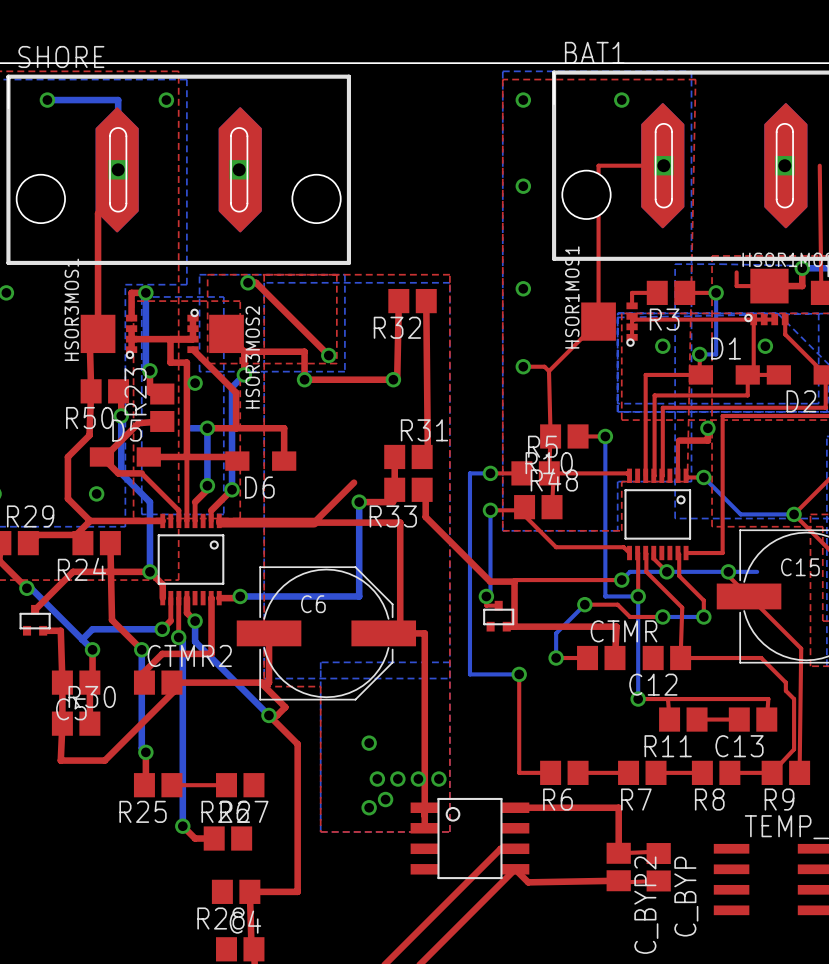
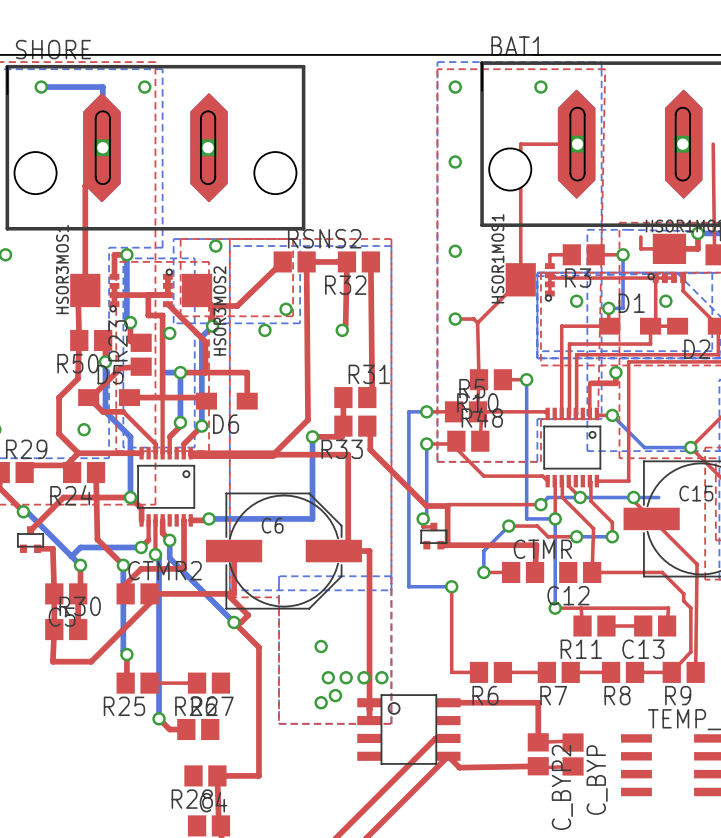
top track: (248, 282) (256, 282) (328, 355) -> none
RSNS2: none -> (294, 261)
top track: none -> (346, 261) (306, 261) (308, 419)
top track: (272, 351) (304, 351) (304, 379) (393, 379) -> (237, 306) (282, 261)

